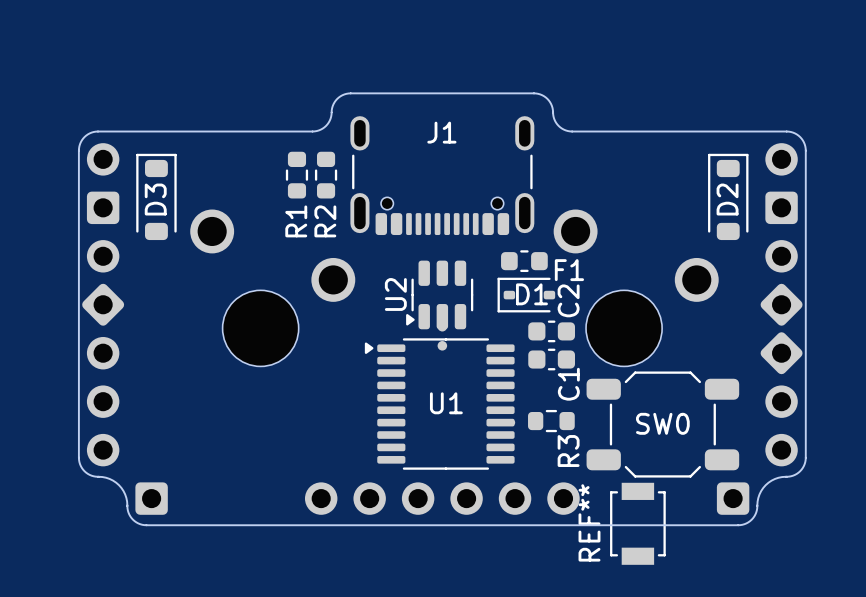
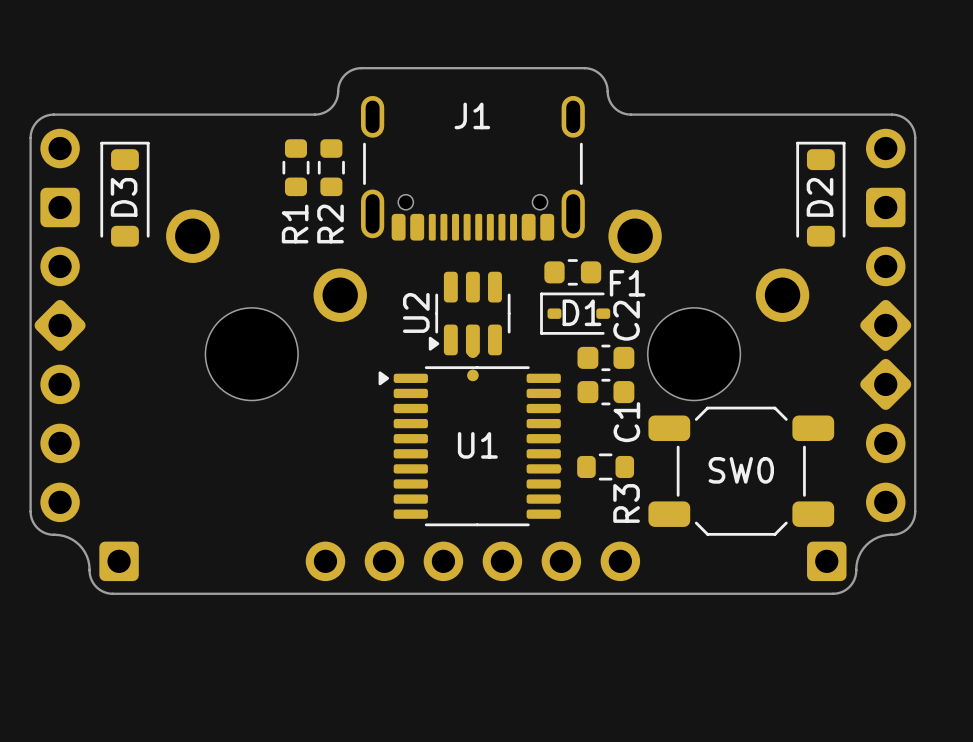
REF**: (637, 523) -> none

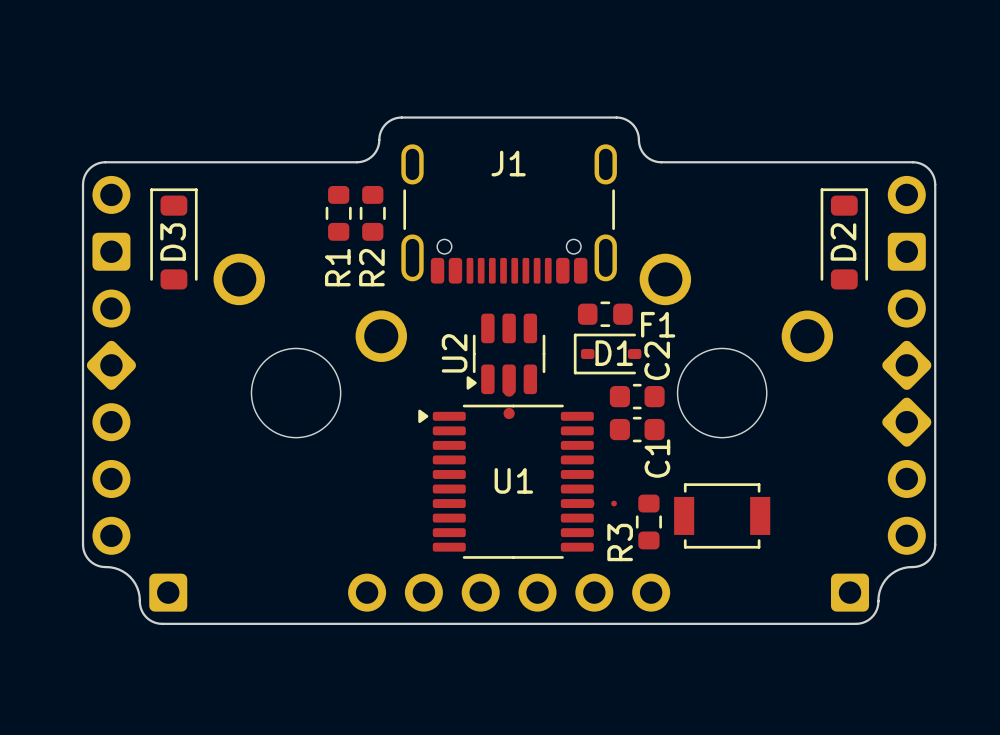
R3 rotation: 0° (605, 466) -> 90° clockwise (648, 522)
SW0: (741, 471) -> none
part: none -> (722, 515)

